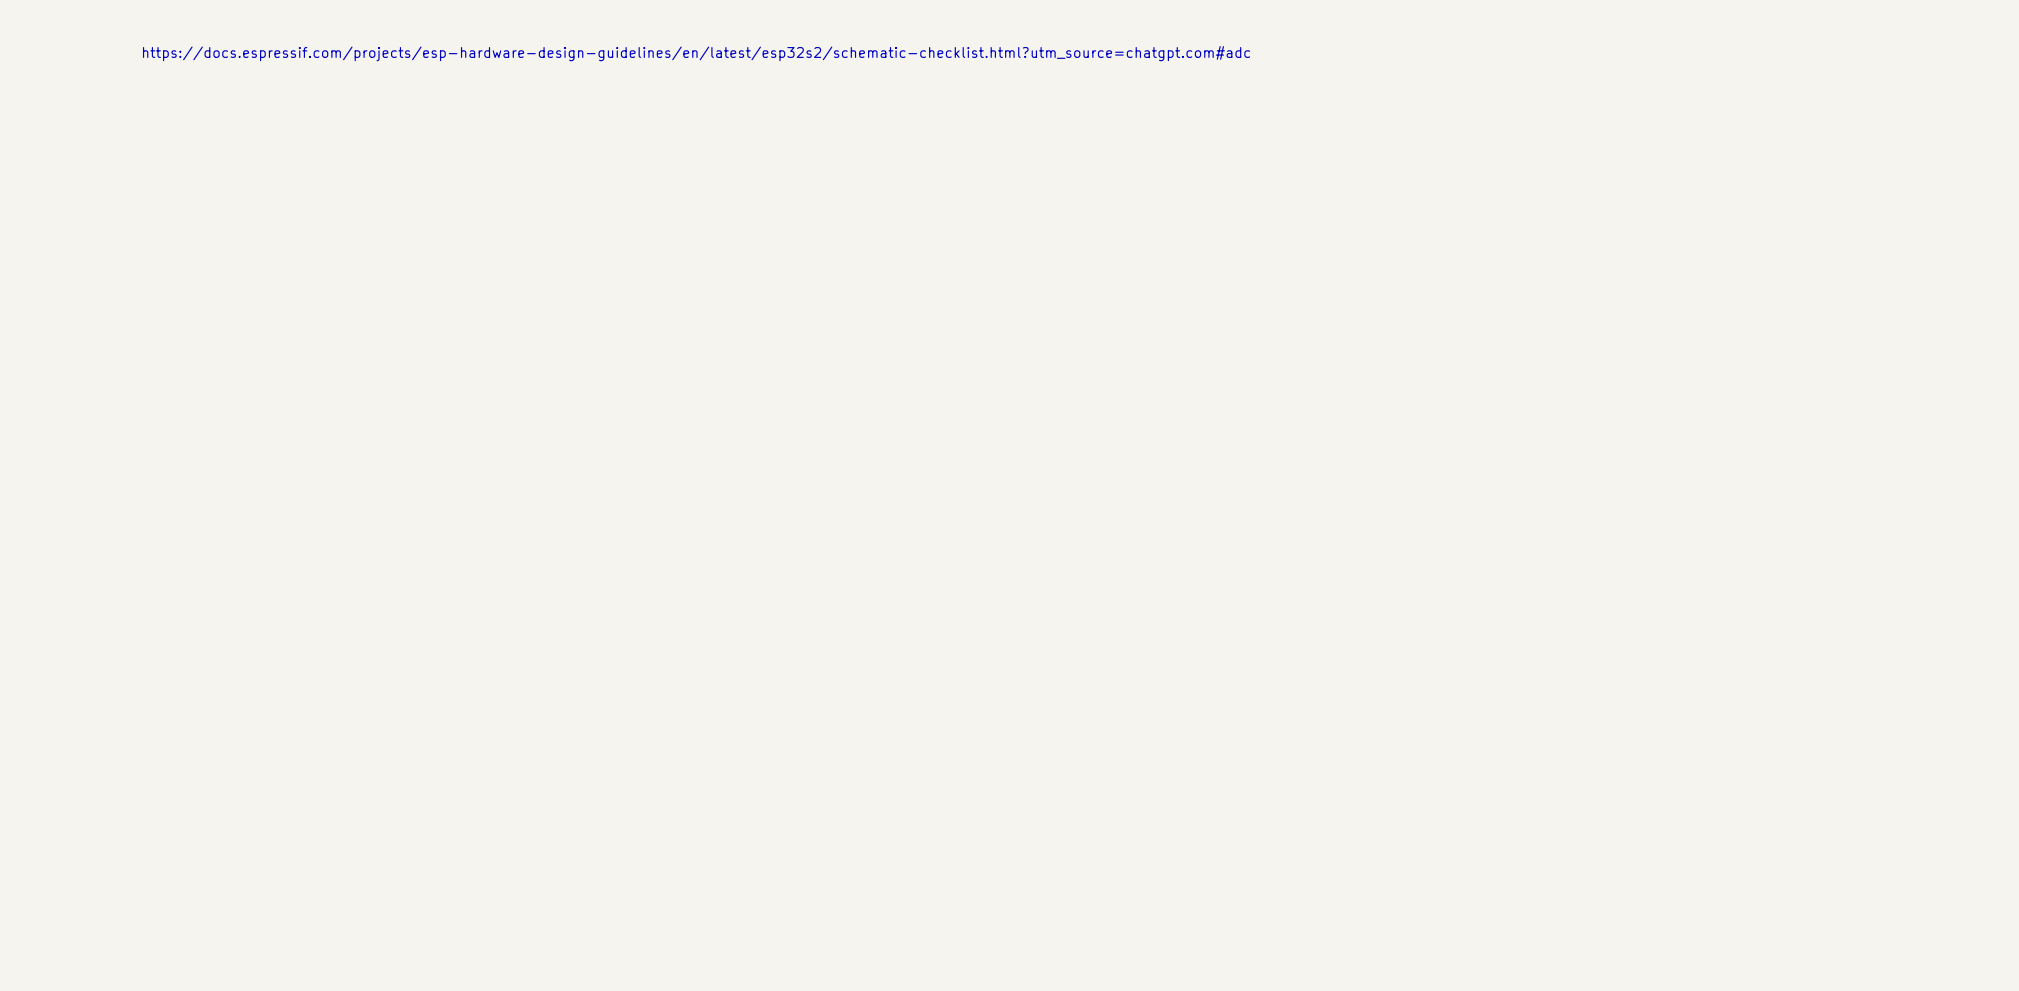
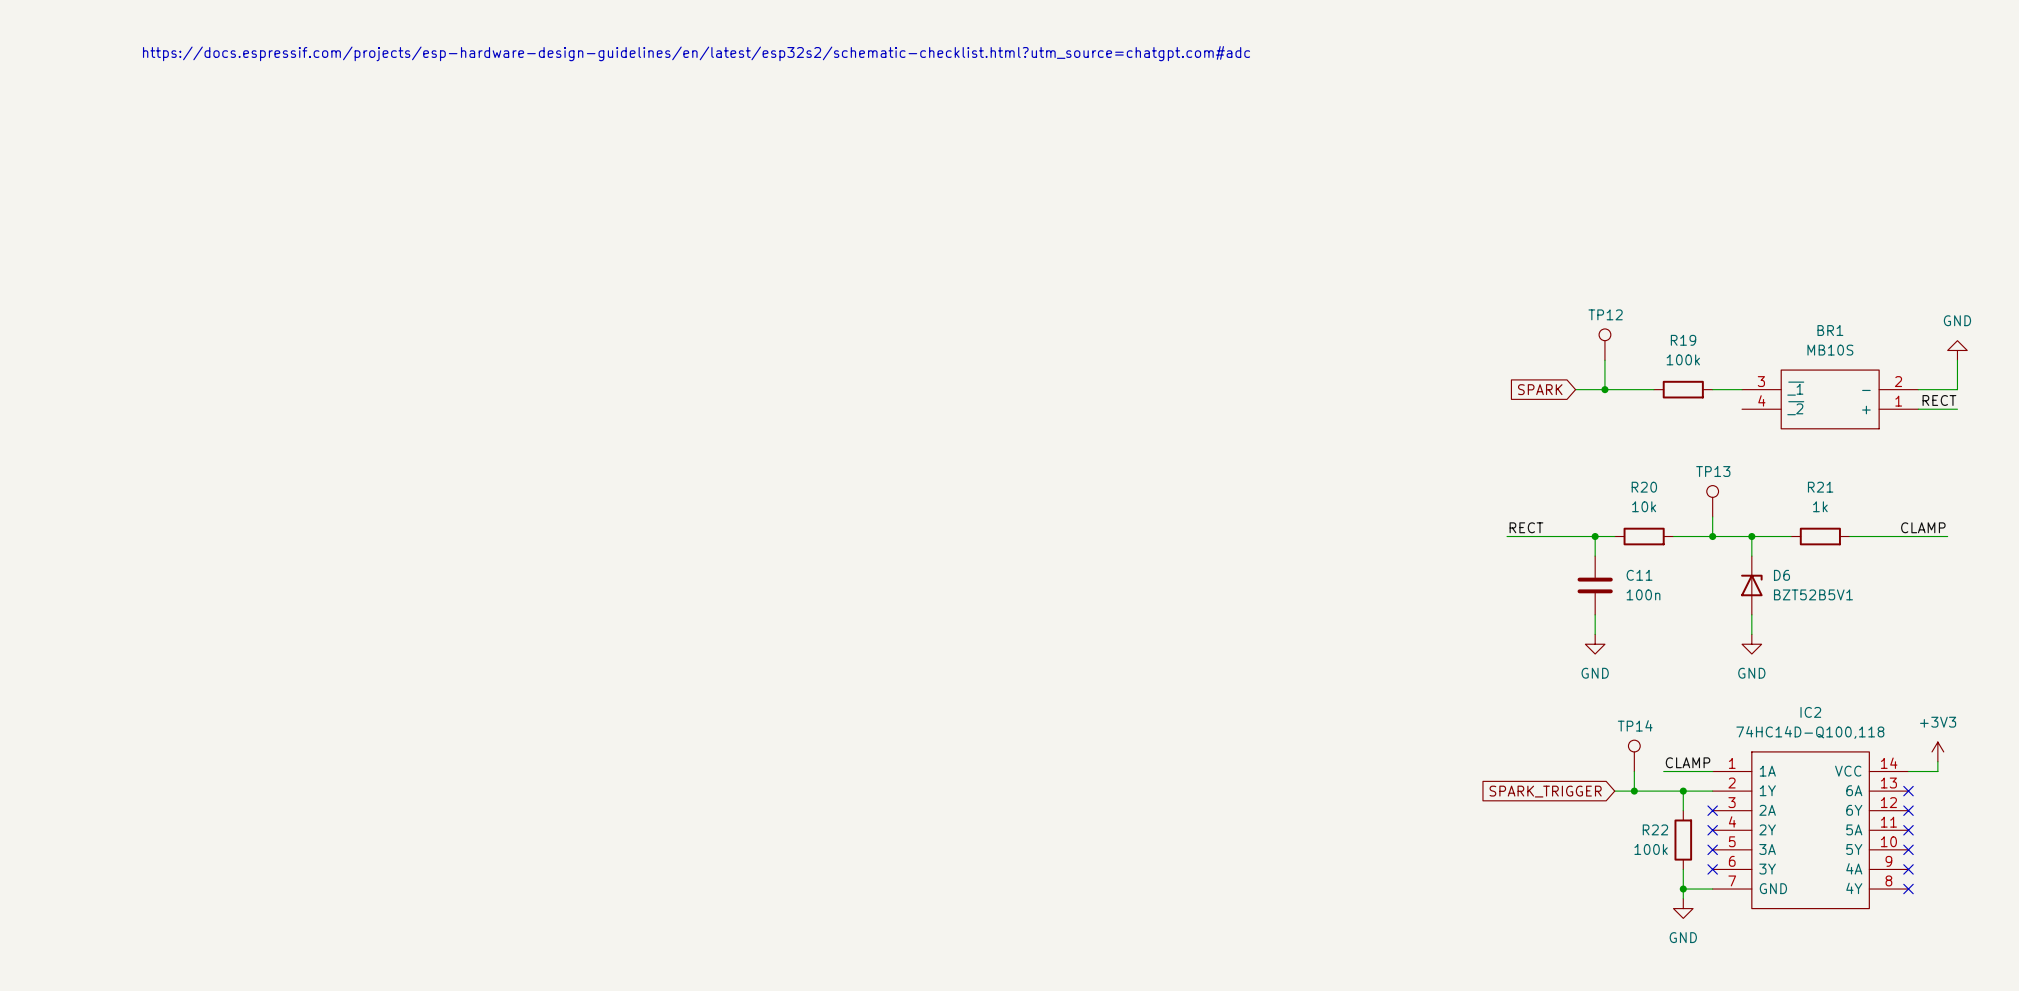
TP12: none -> (1604, 344)
power symbol: none -> GND (1957, 350)
wire: none -> (1604, 360) (1604, 389)
wire: none -> (1957, 360) (1957, 389) (1918, 389)
global label: none -> SPARK (1540, 389)
wire: none -> (1575, 389) (1653, 389)
junction: none -> (1604, 389)
R19: none -> 100k (1683, 389)
wire: none -> (1712, 389) (1742, 389)
BR1: none -> MB10S (1830, 399)
label: none -> RECT (1939, 400)
wire: none -> (1918, 409) (1957, 409)
TP13: none -> (1712, 501)
wire: none -> (1712, 516) (1712, 536)
label: none -> RECT (1526, 527)
label: none -> CLAMP (1923, 527)
wire: none -> (1507, 536) (1614, 536)
wire: none -> (1595, 536) (1595, 556)
junction: none -> (1595, 536)
R20: none -> 10k (1644, 536)
wire: none -> (1673, 536) (1791, 536)
junction: none -> (1712, 536)
wire: none -> (1751, 536) (1751, 556)
junction: none -> (1751, 536)
R21: none -> 1k (1820, 536)
wire: none -> (1849, 536) (1947, 536)
C11: none -> 100n (1595, 585)
D6: none -> BZT52B5V1 (1751, 585)
wire: none -> (1595, 614) (1595, 634)
wire: none -> (1751, 614) (1751, 634)
power symbol: none -> GND (1595, 644)
power symbol: none -> GND (1751, 644)
power symbol: none -> +3V3 (1937, 751)
TP14: none -> (1634, 755)
wire: none -> (1937, 761) (1937, 771) (1908, 771)
label: none -> CLAMP (1688, 762)
wire: none -> (1634, 771) (1634, 791)
wire: none -> (1663, 771) (1712, 771)
global label: none -> SPARK_TRIGGER (1545, 791)
wire: none -> (1614, 791) (1712, 791)
junction: none -> (1634, 791)
wire: none -> (1683, 791) (1683, 810)
junction: none -> (1683, 791)
no-connect mark: none -> (1908, 791)
no-connect mark: none -> (1712, 810)
no-connect mark: none -> (1908, 810)
no-connect mark: none -> (1712, 830)
IC2: none -> 74HC14D-Q100,118 (1810, 830)
no-connect mark: none -> (1908, 830)
R22: none -> 100k (1683, 840)
no-connect mark: none -> (1712, 849)
no-connect mark: none -> (1908, 849)
wire: none -> (1683, 869) (1683, 898)
no-connect mark: none -> (1712, 869)
no-connect mark: none -> (1908, 869)
wire: none -> (1683, 889) (1712, 889)
junction: none -> (1683, 889)
no-connect mark: none -> (1908, 889)
power symbol: none -> GND (1683, 908)

